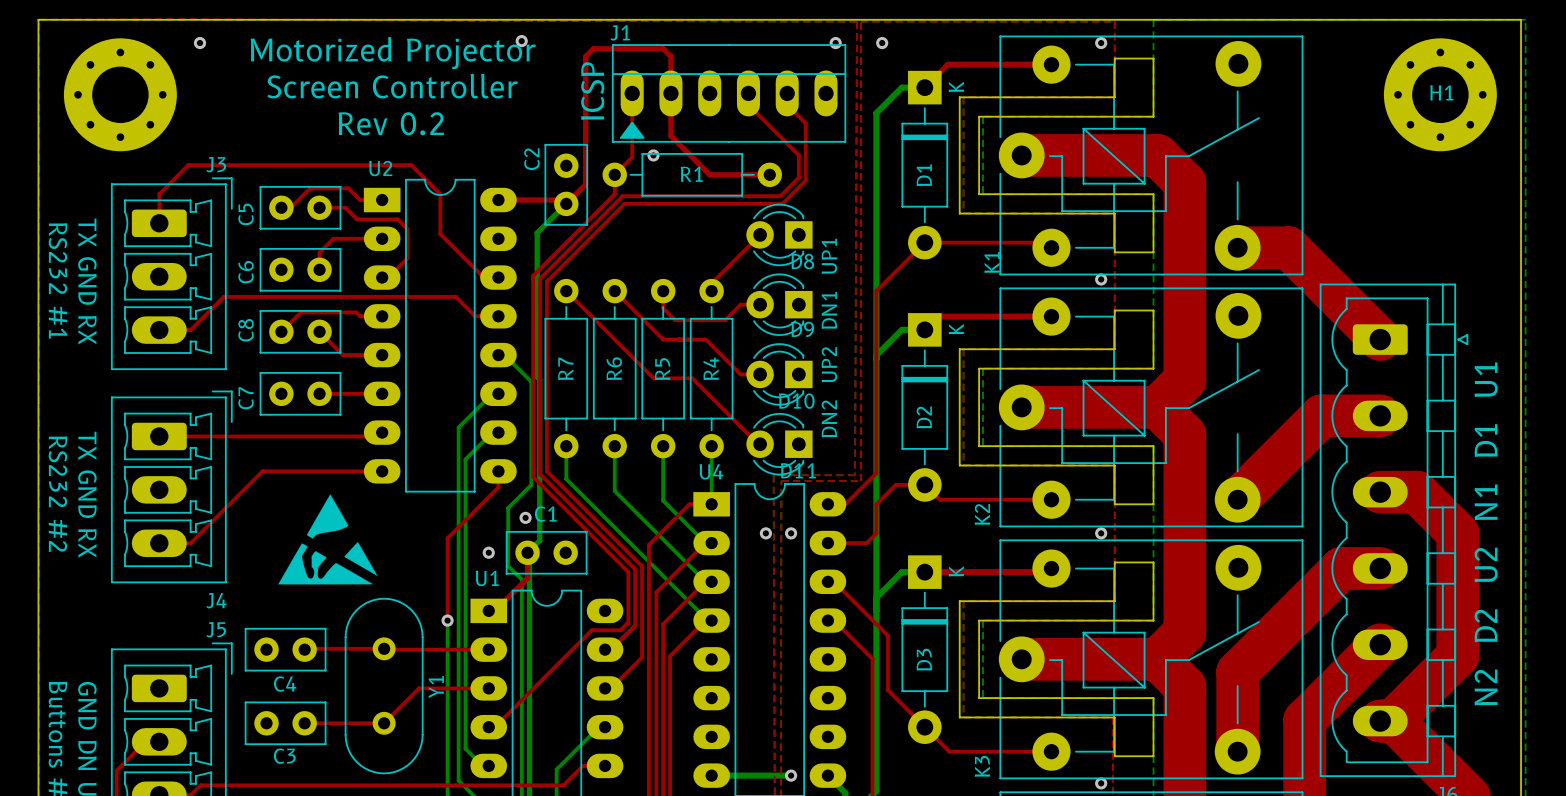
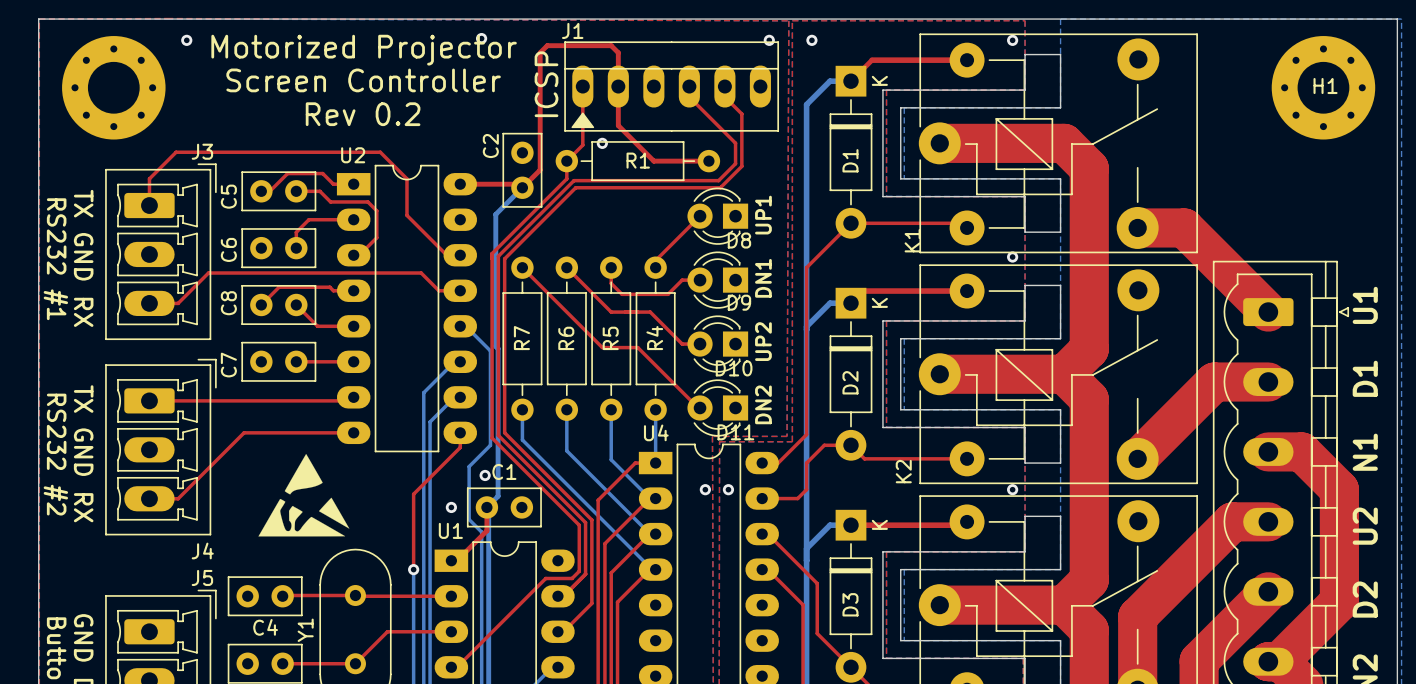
Y1 name position: Y1 (436, 687) -> Y1 (305, 630)

